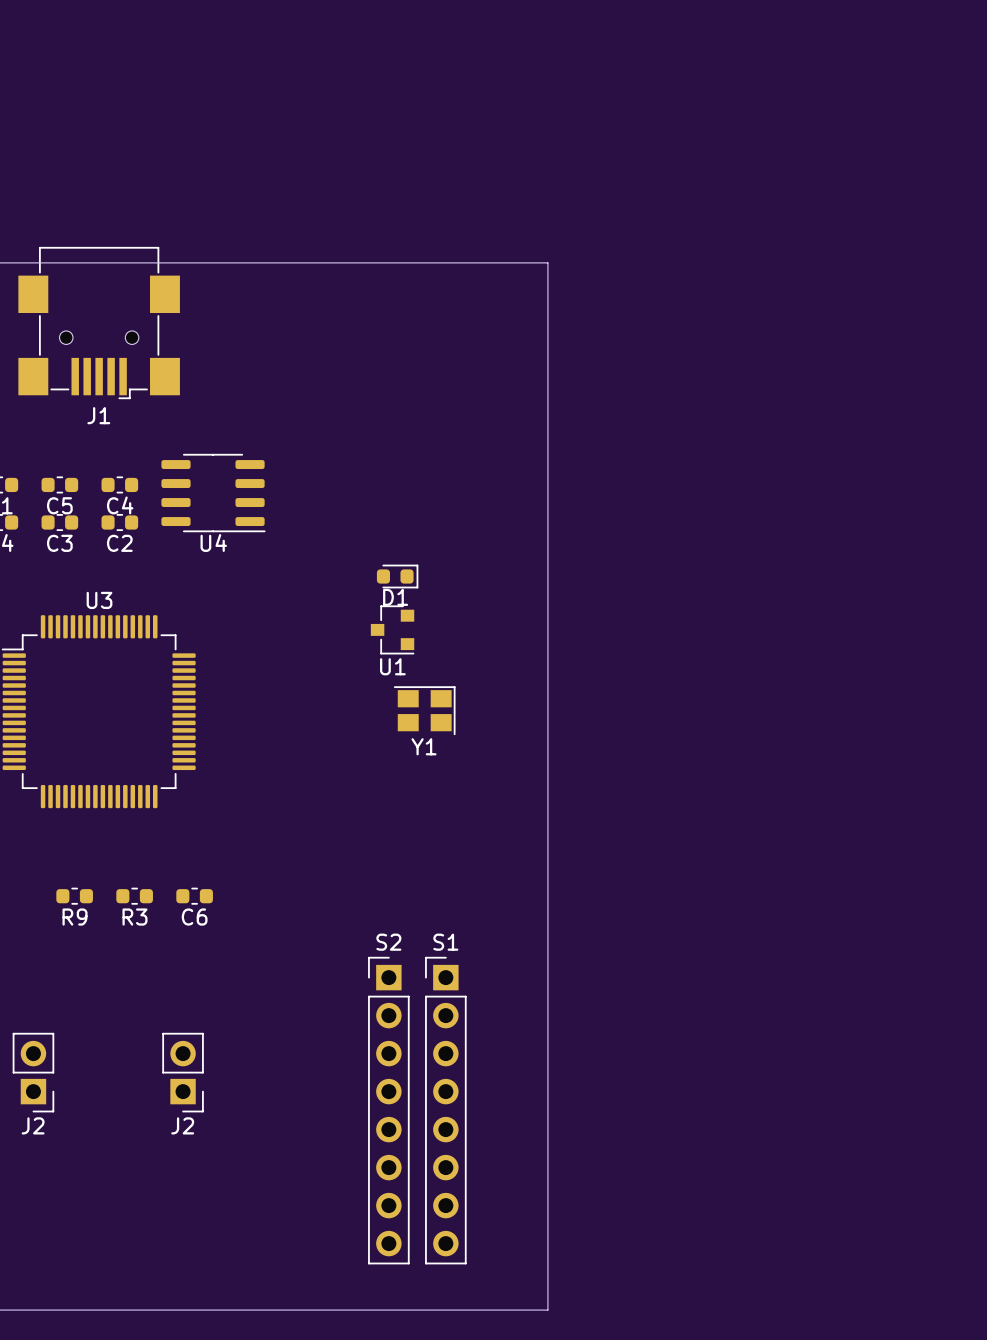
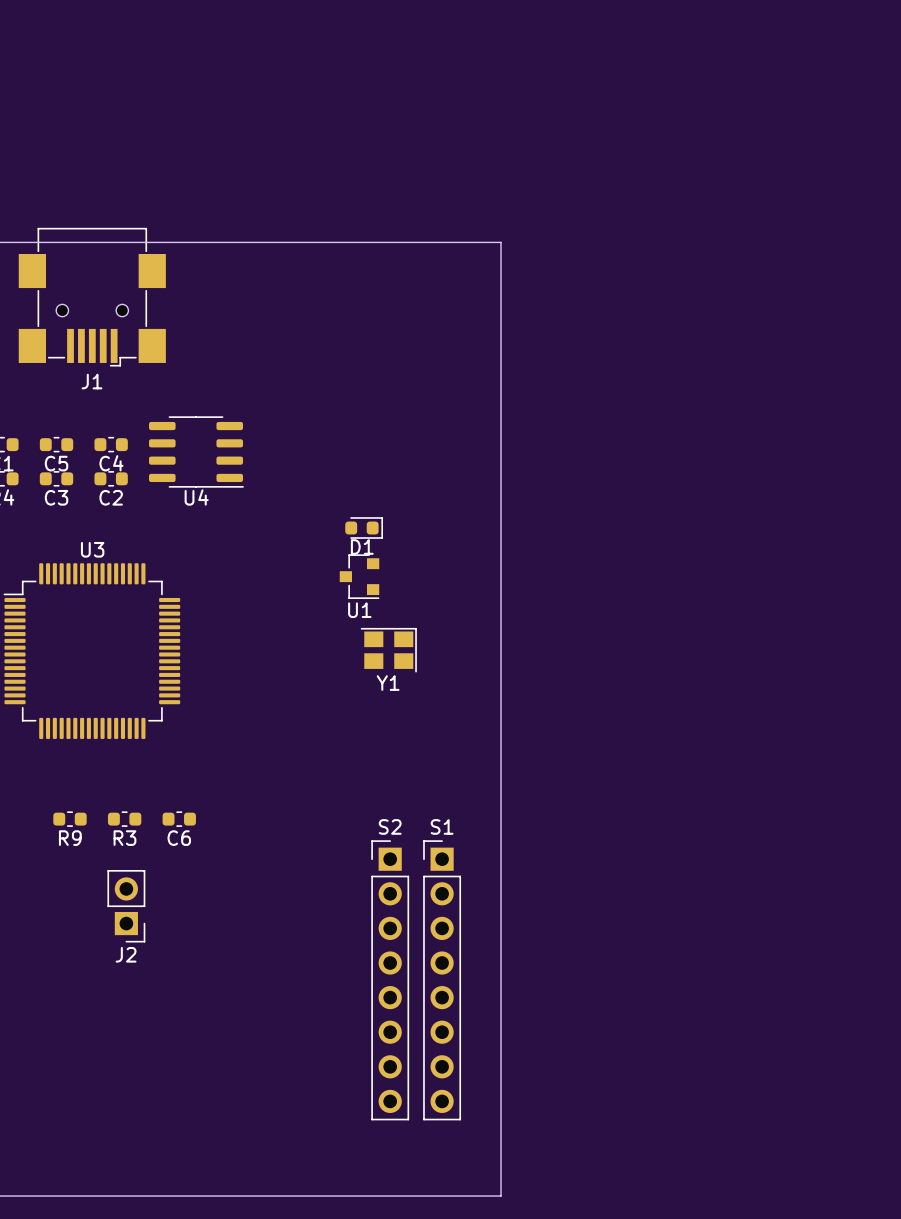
J2: none -> (126, 906)
J2: (33, 1072) -> none
J2: (183, 1072) -> none
S2 position: (388, 1110) -> (390, 980)
S1 position: (445, 1110) -> (442, 980)

